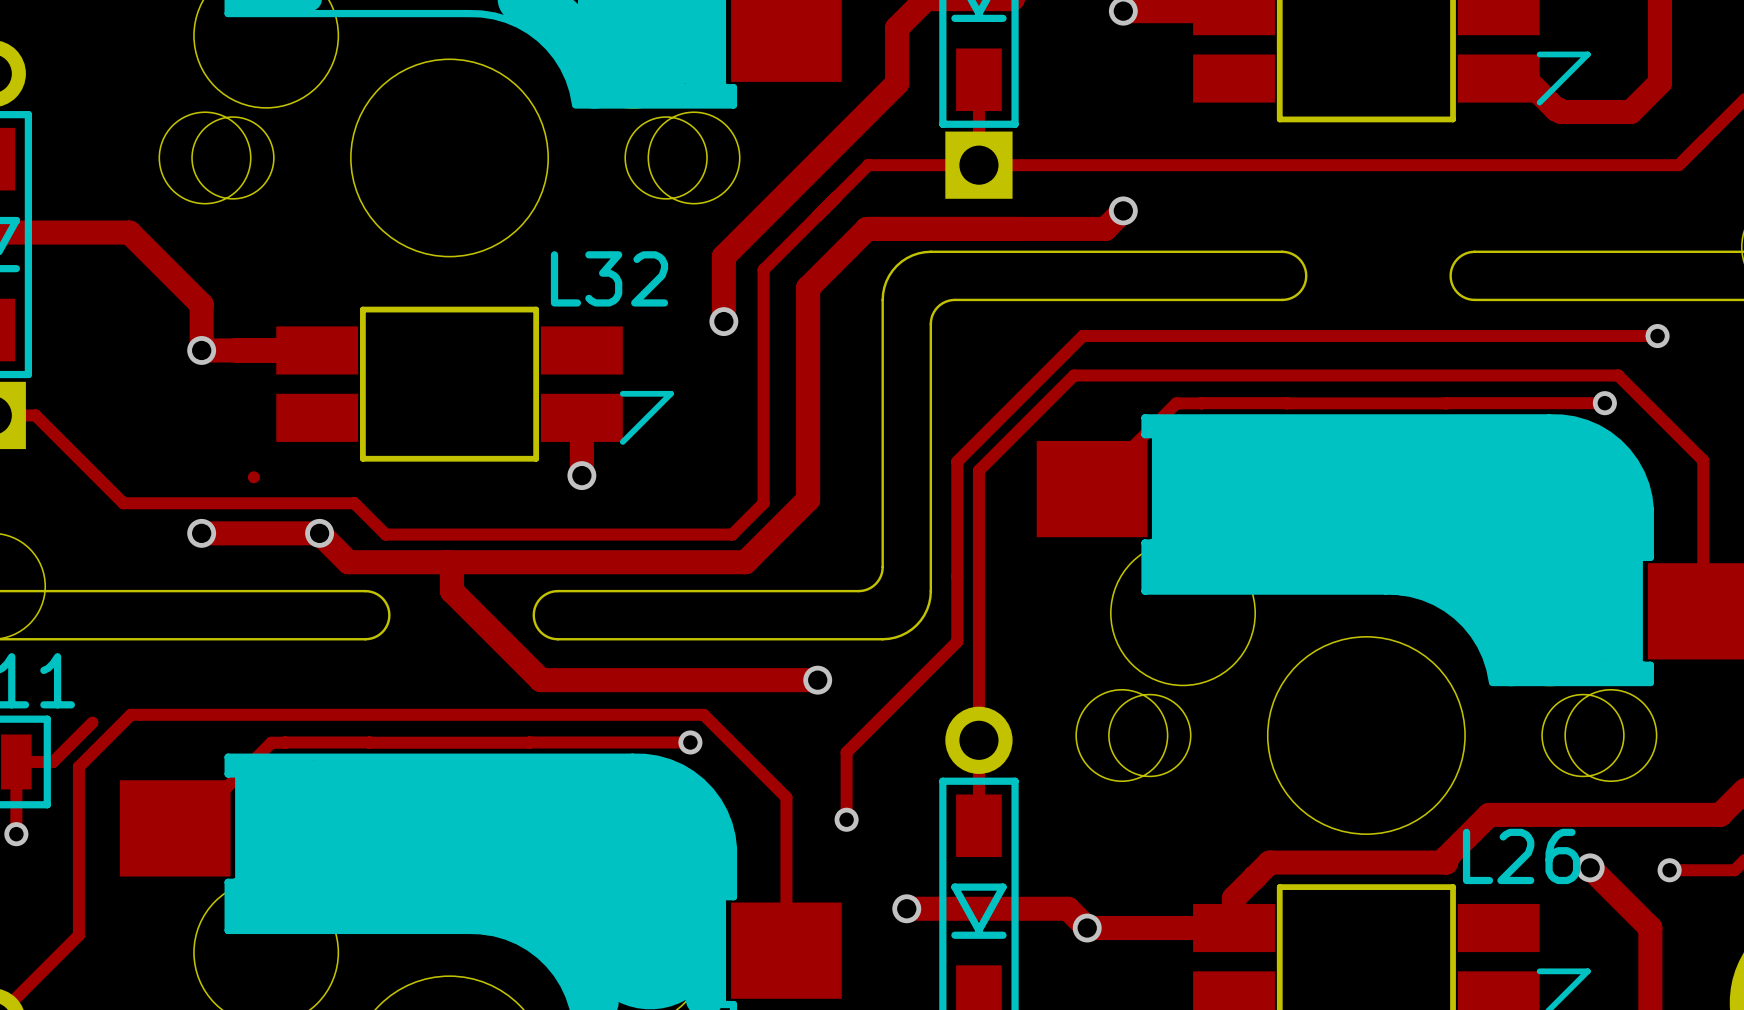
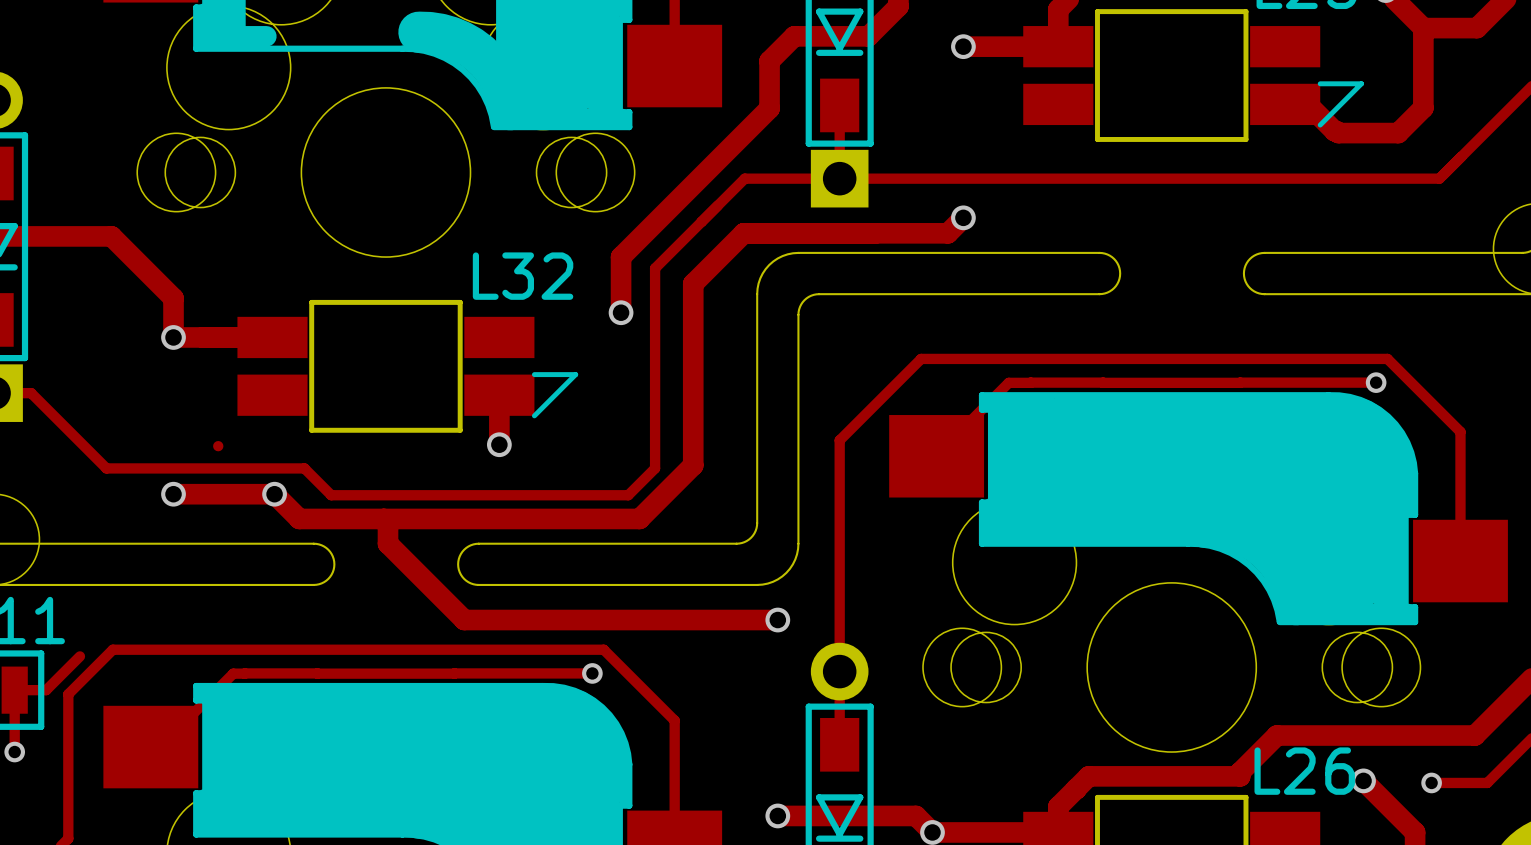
track: (1657, 336) (1082, 336) (957, 461) (957, 641) (846, 752) (846, 819) -> none
via: (1657, 336) -> none
track: none -> (701, 620) (777, 620)
via position: (817, 680) -> (777, 620)
via: (846, 819) -> none

